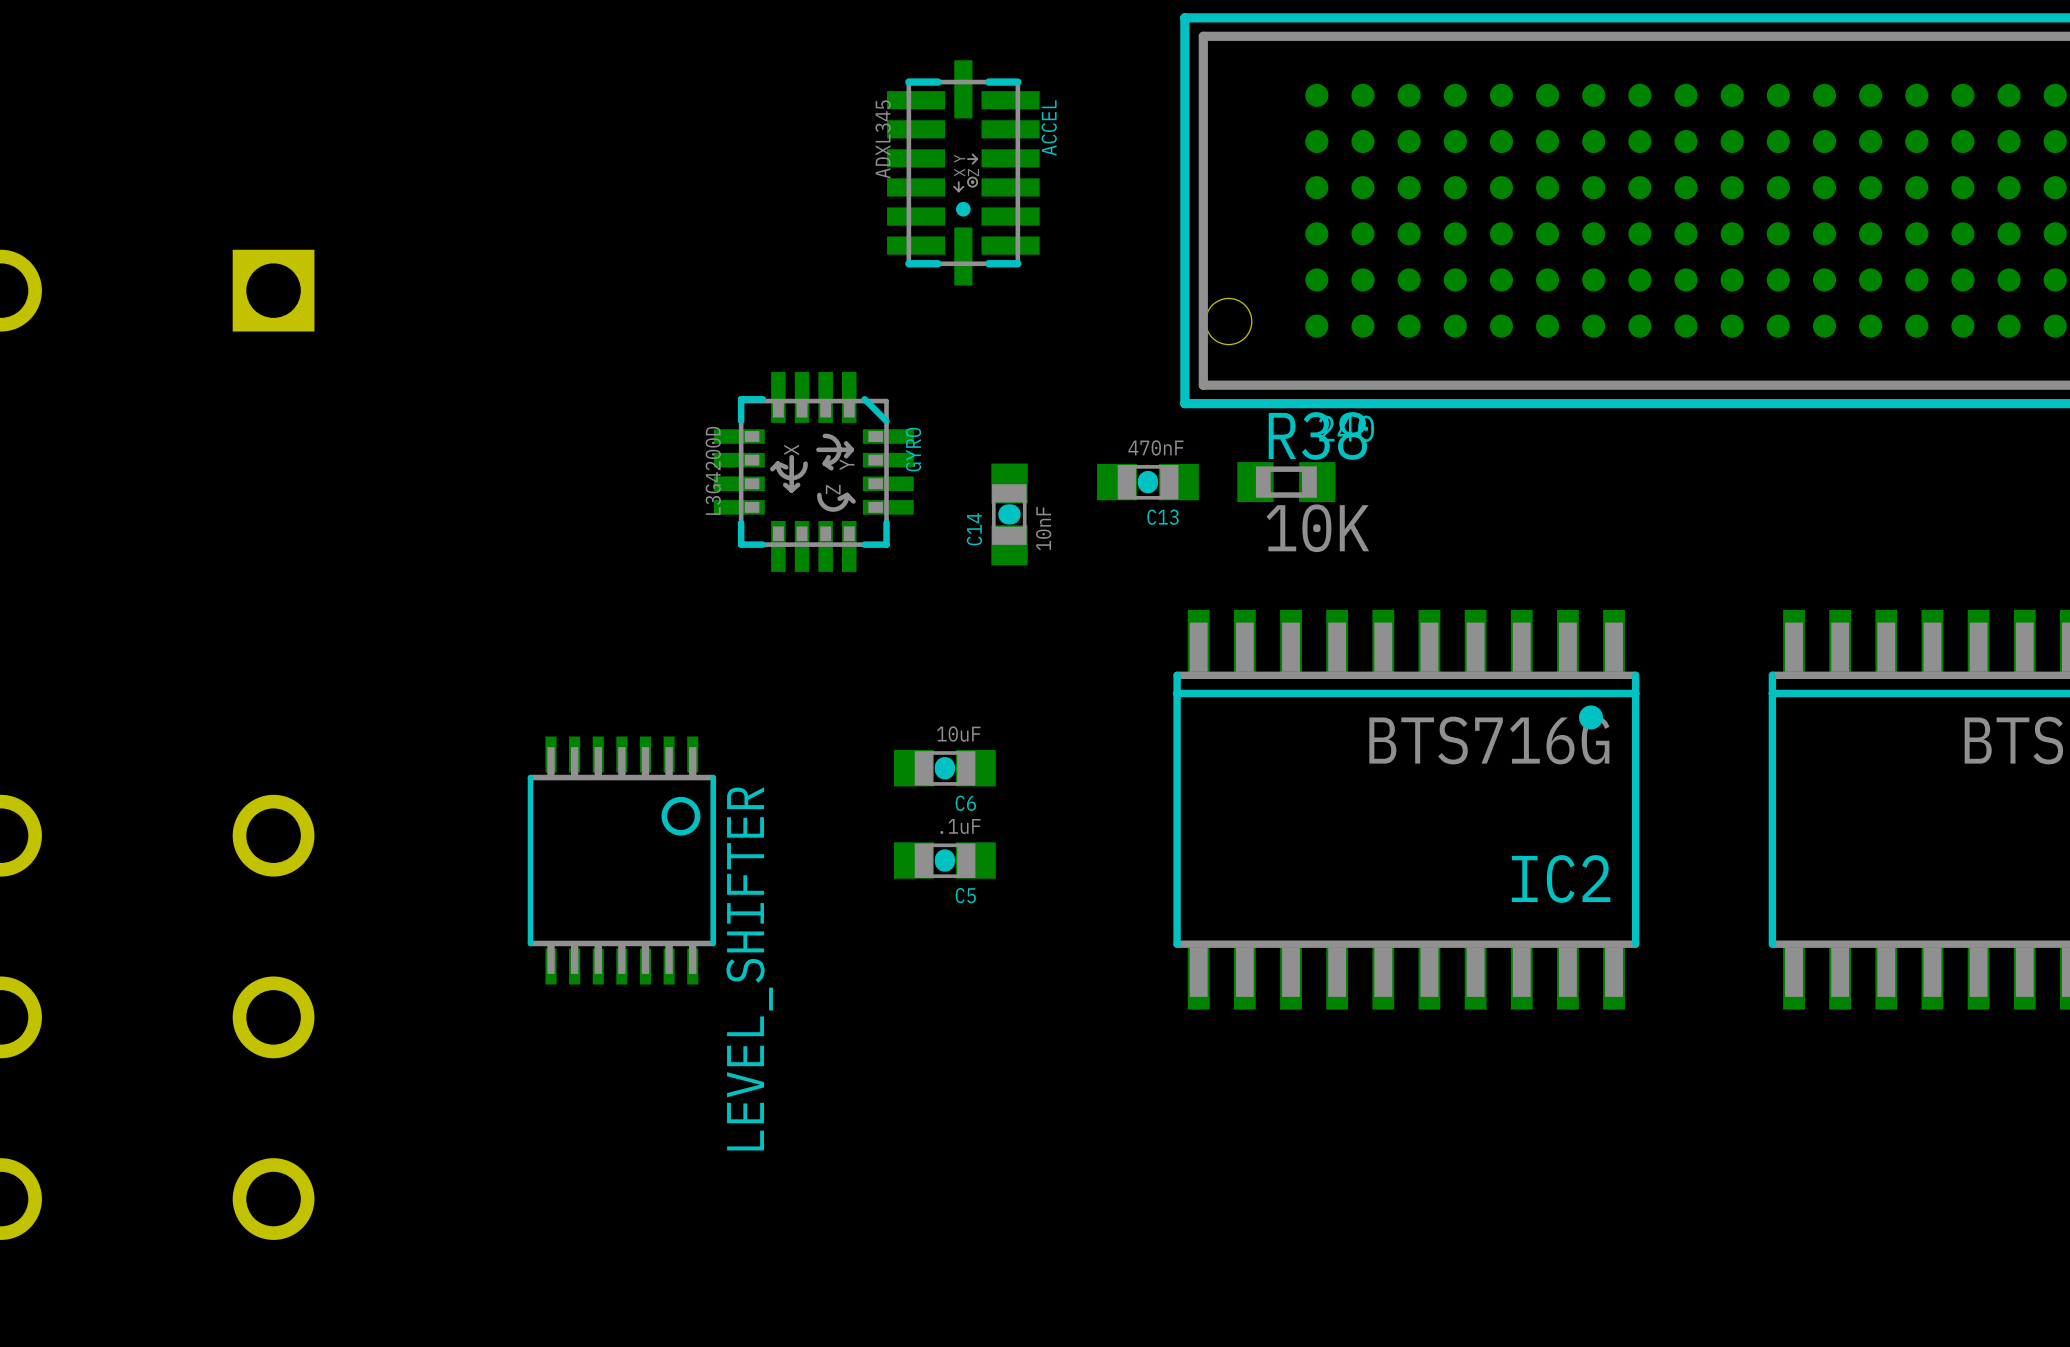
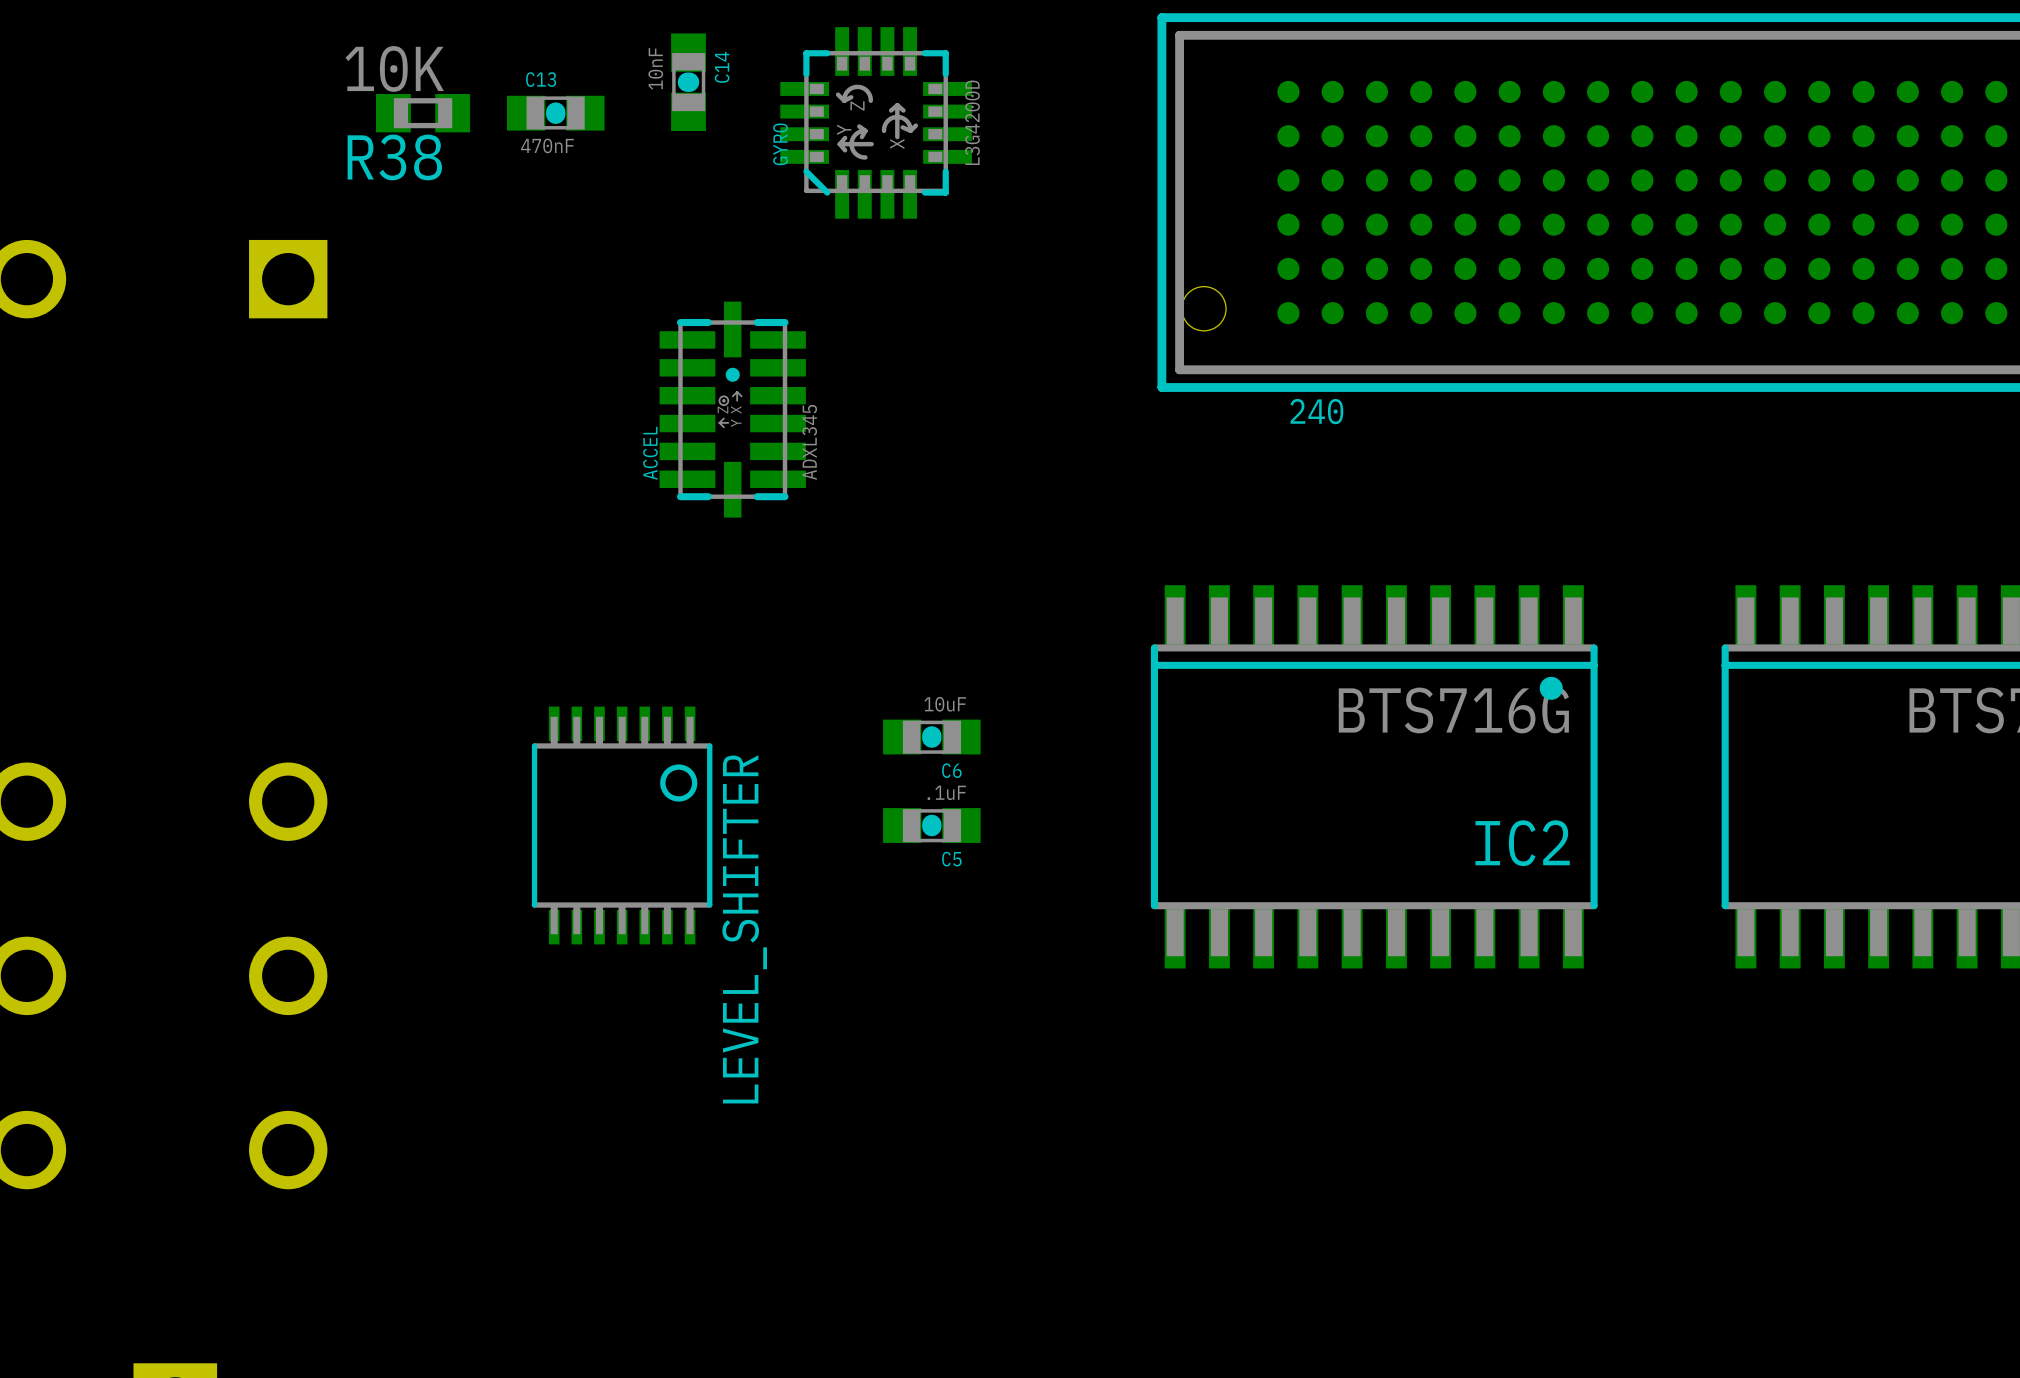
GYRO: none -> L3G4200D (876, 122)
ACCEL: ADXL345 (963, 172) -> none
ACCEL: none -> ADXL345 (732, 409)
R38 name position: R38 (1317, 435) -> R38 (394, 157)
C13 value position: 470nF (1155, 447) -> 470nF (547, 145)
GYRO: L3G4200D (813, 471) -> none
C13 position: (1147, 482) -> (555, 113)
R38 position: (1286, 482) -> (423, 113)
C14 position: (1009, 514) -> (688, 82)
C13 name position: C13 (1163, 517) -> C13 (541, 79)
C14 value position: 10nF (1043, 528) -> 10nF (655, 68)
R38 value position: 10K (1317, 528) -> 10K (394, 68)
C14 name position: C14 (974, 529) -> C14 (722, 67)

